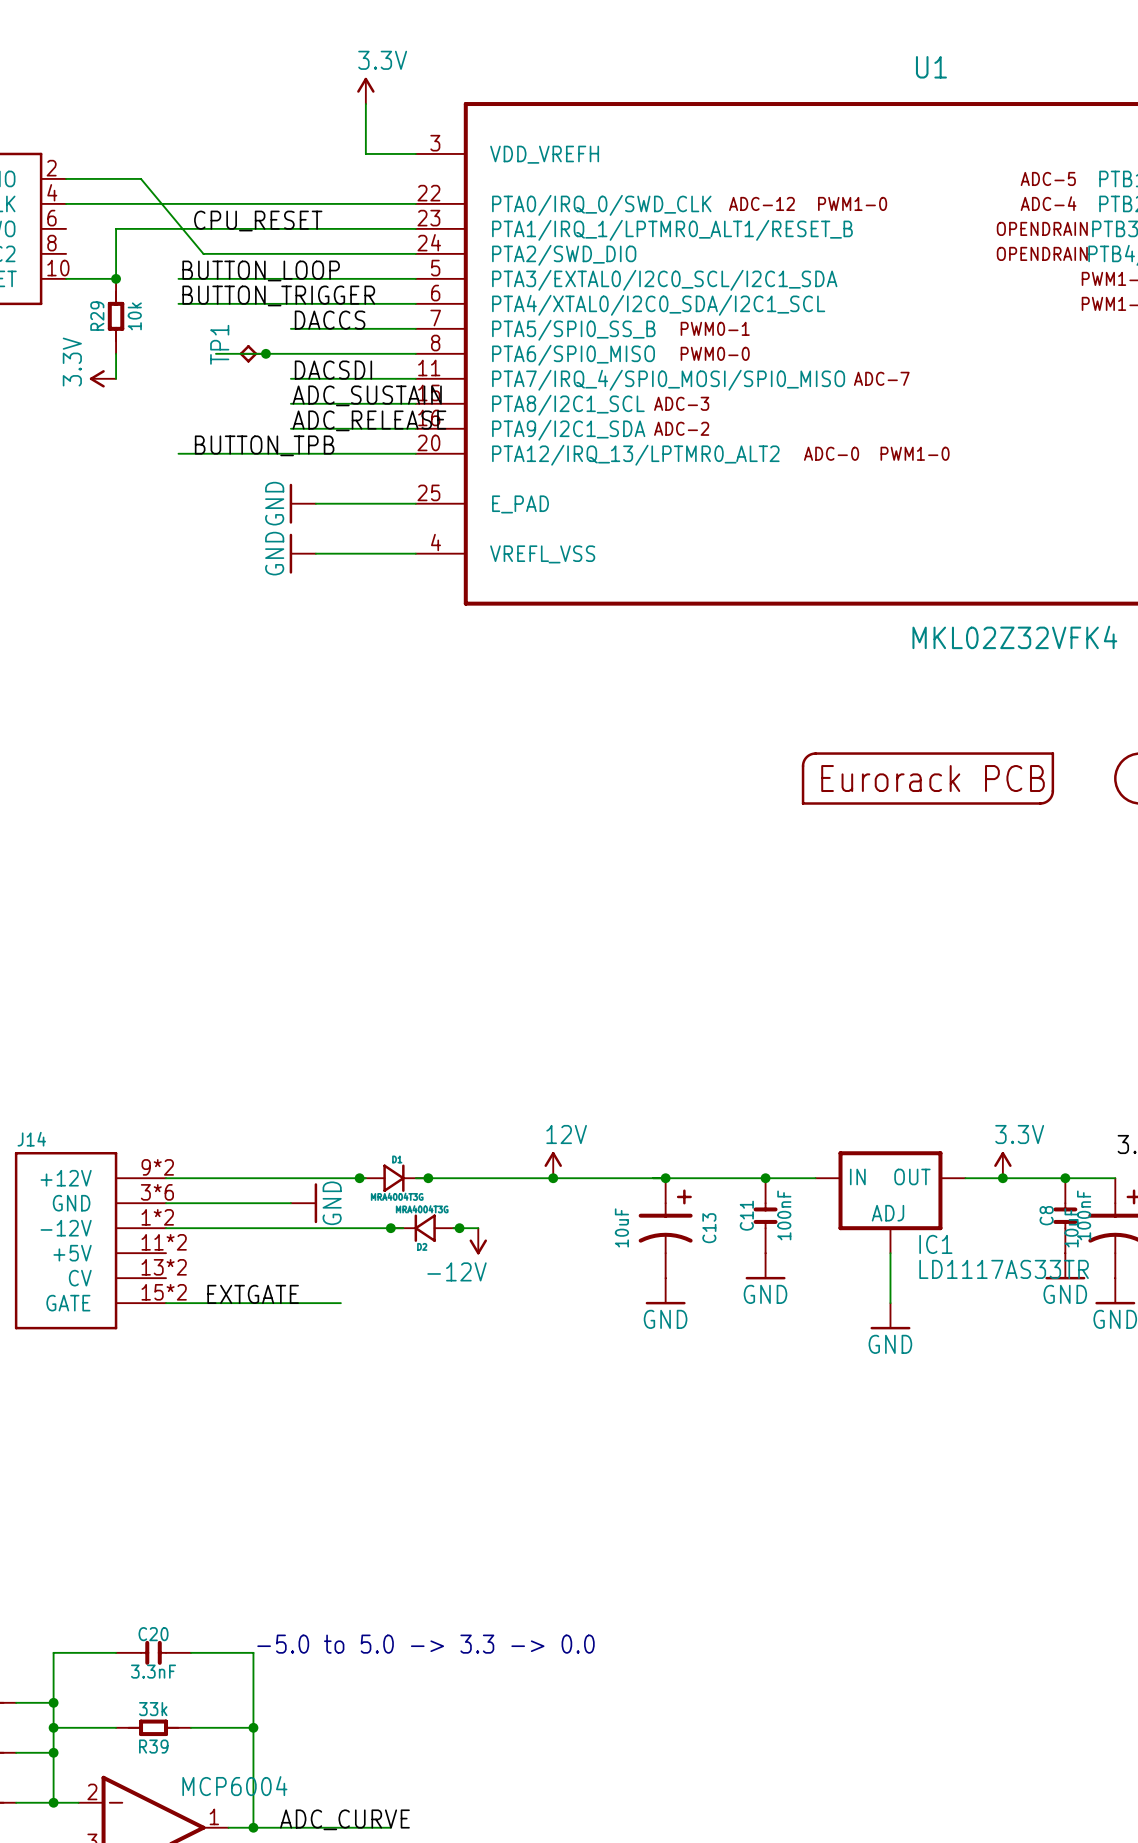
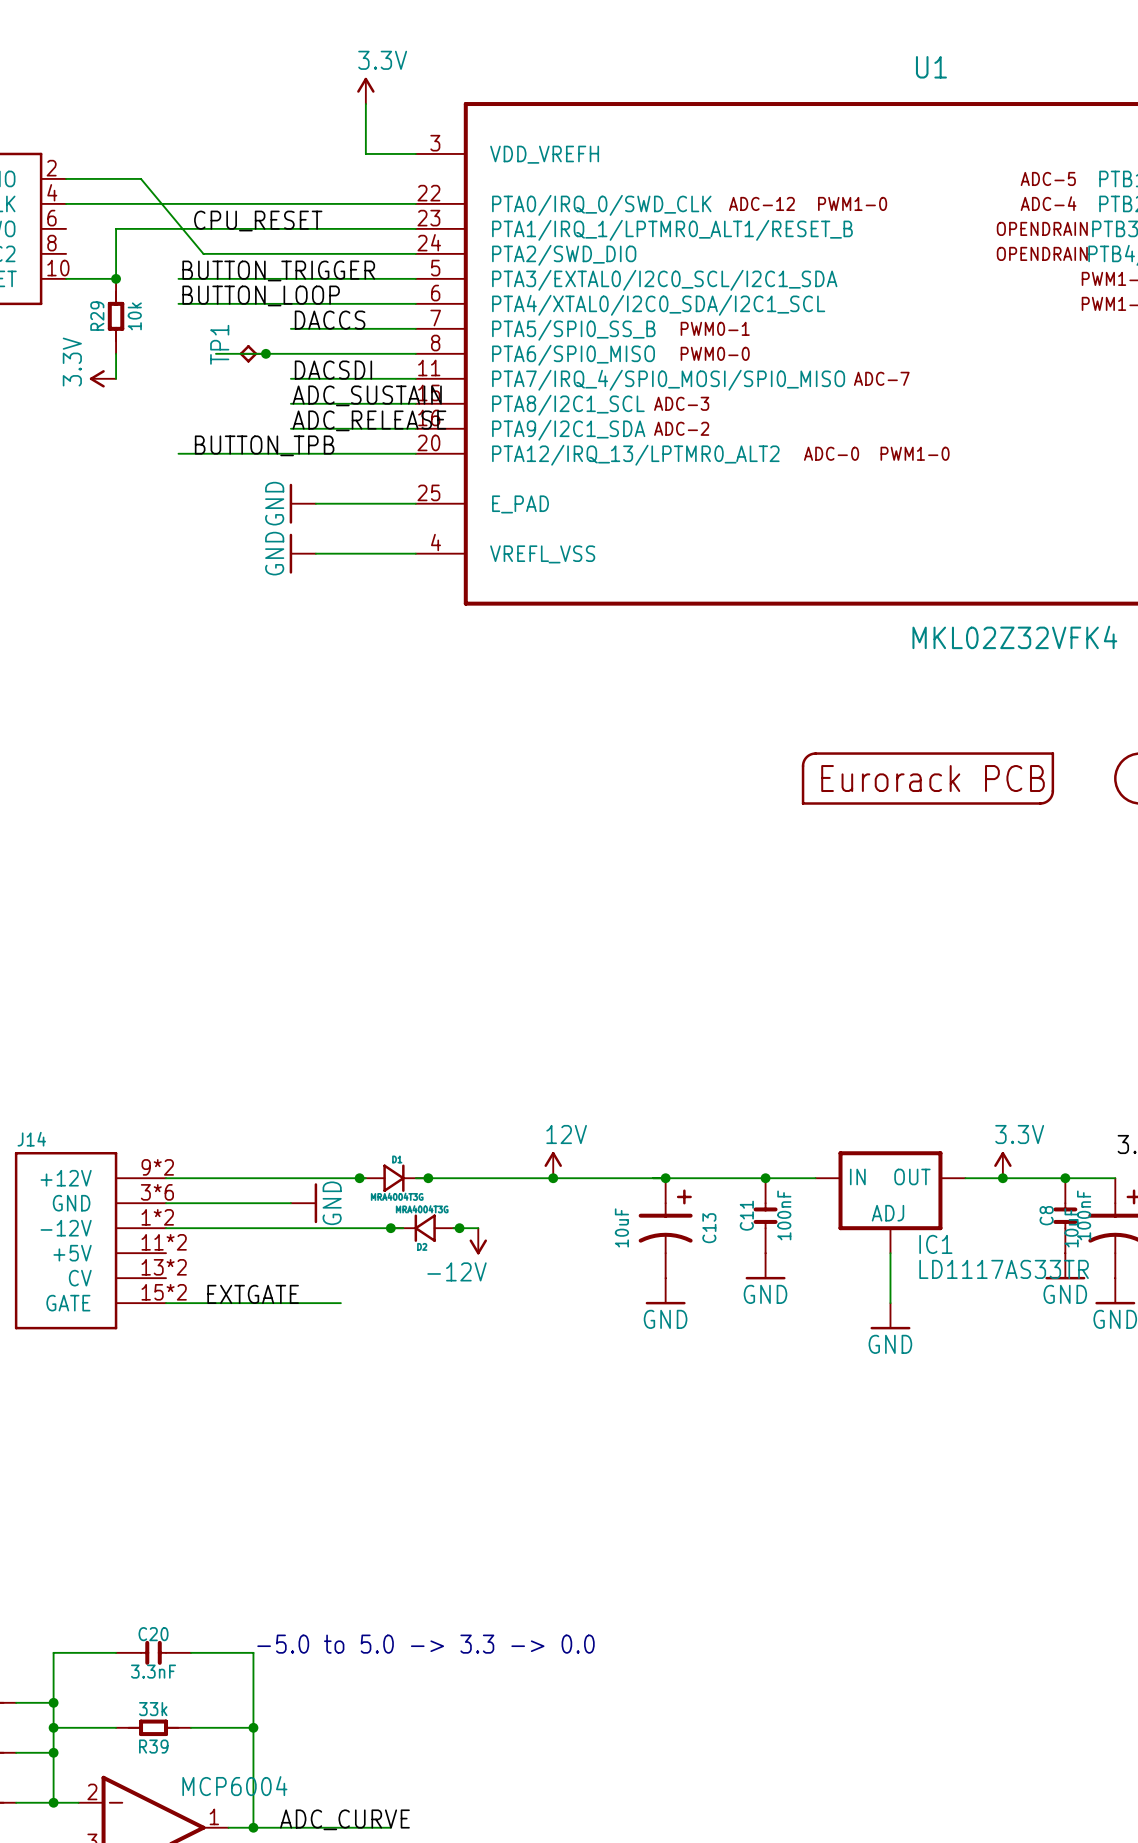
label: BUTTON_LOOP (261, 270) -> BUTTON_TRIGGER (278, 270)
label: BUTTON_TRIGGER (278, 295) -> BUTTON_LOOP (261, 295)

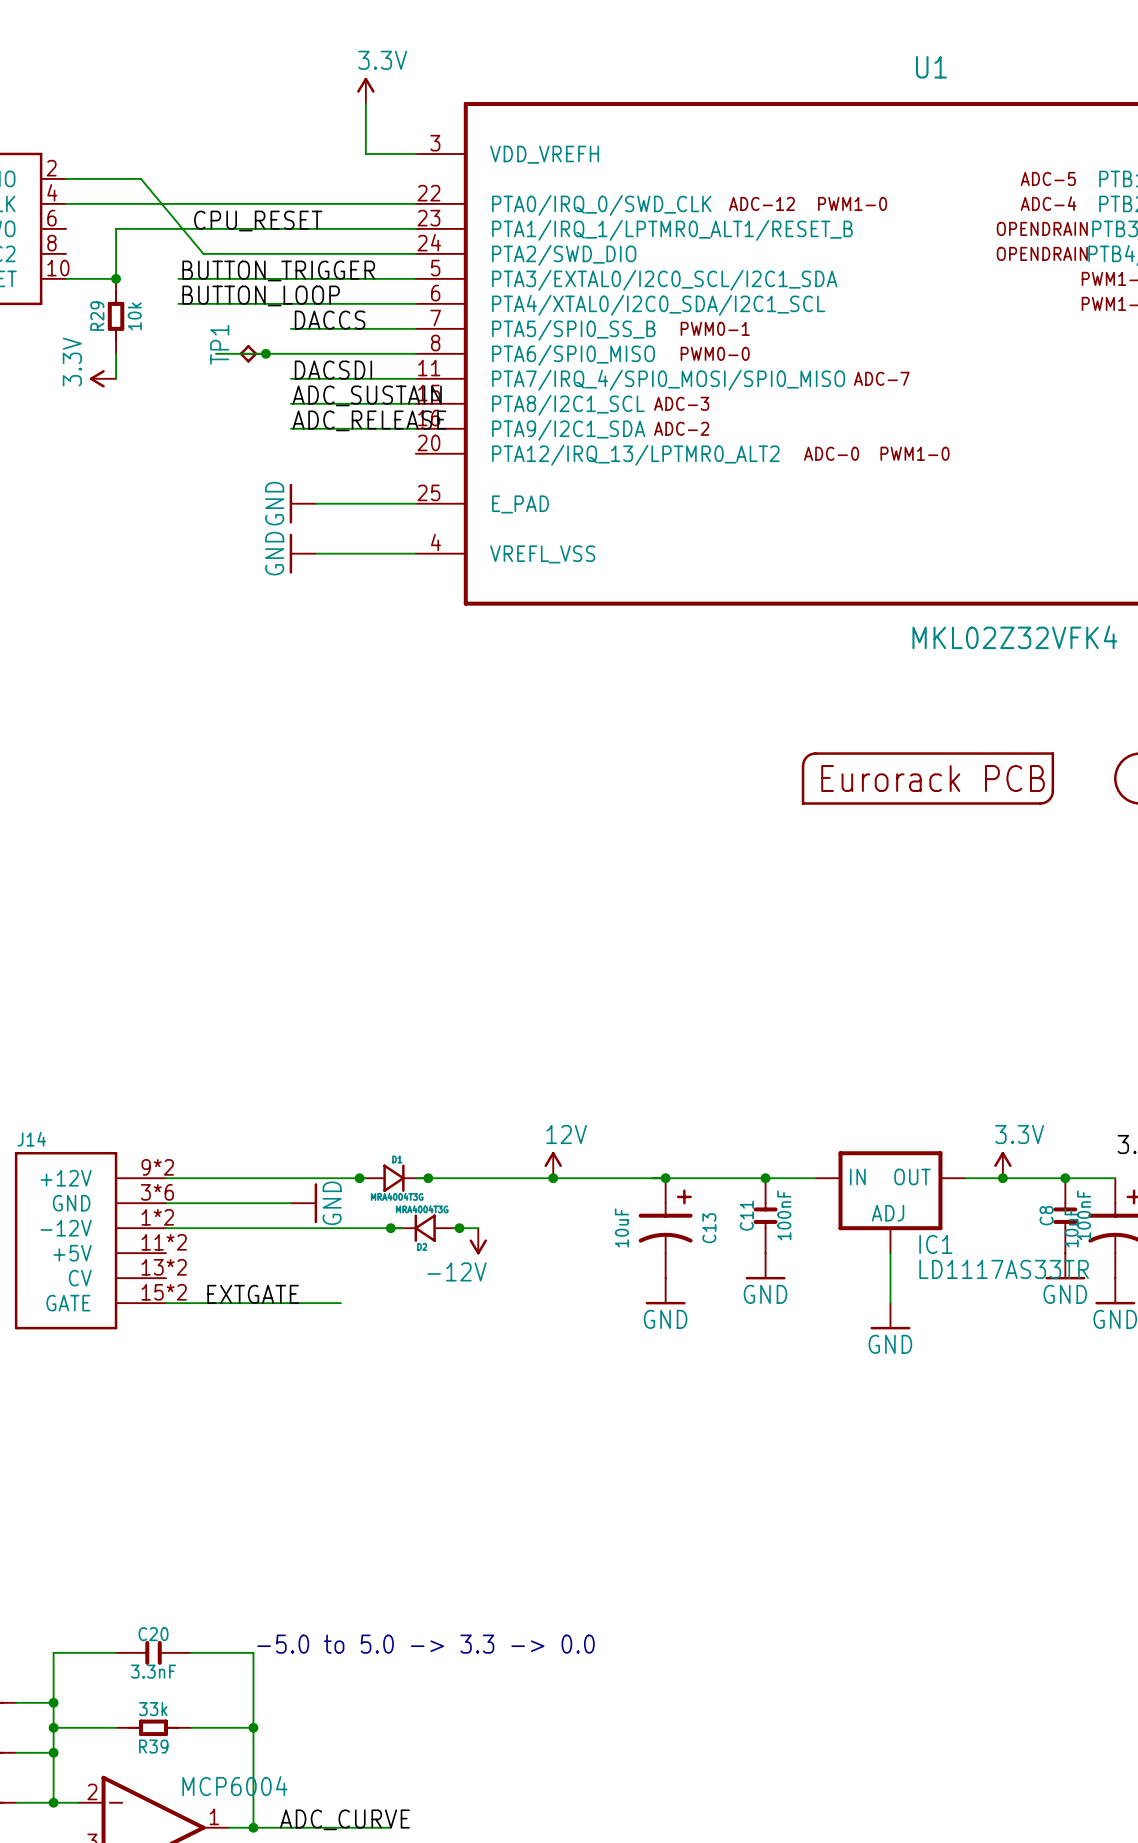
label: BUTTON_TPB (264, 445) -> none
wire: (178, 453) (415, 453) -> none

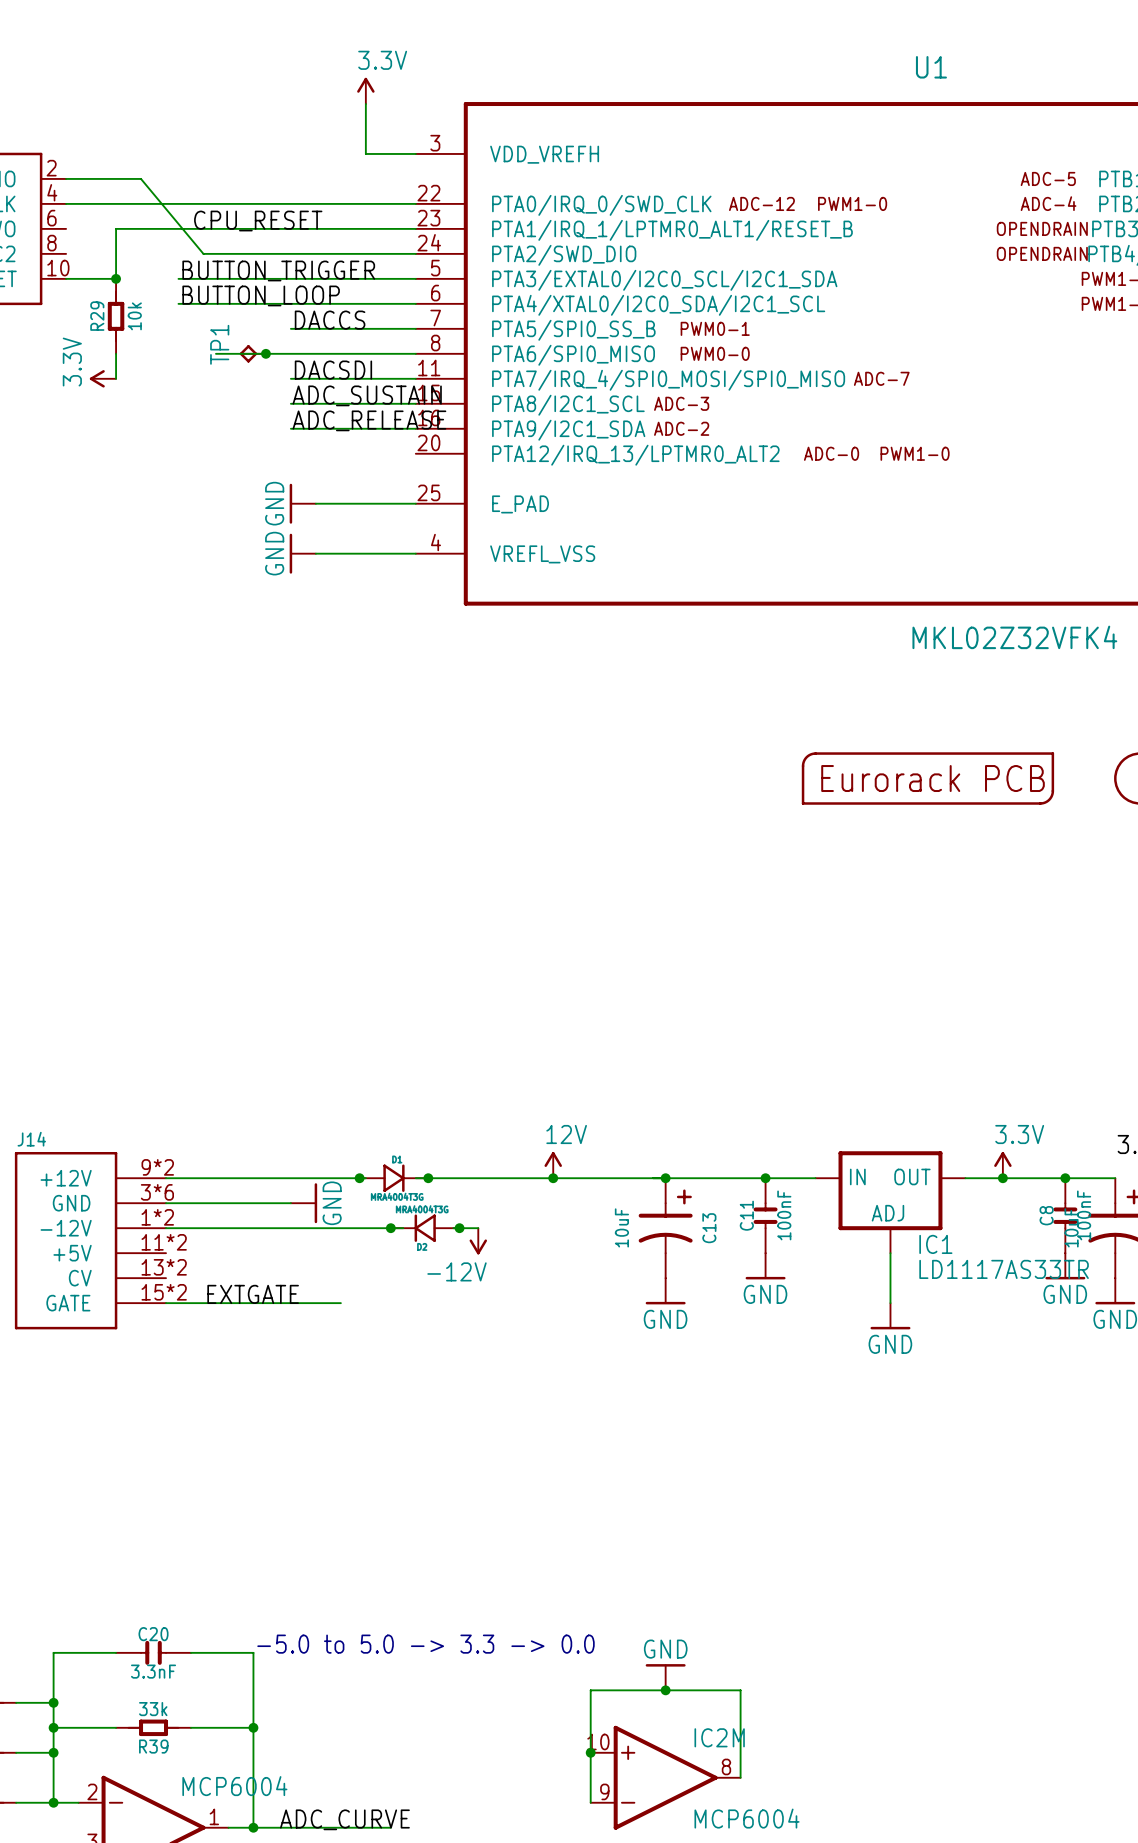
power symbol: none -> GND (665, 1677)
junction: none -> (665, 1690)
junction: none -> (590, 1752)
IC2M: none -> MCP6004 (665, 1777)
wire: none -> (740, 1777) (740, 1690) (590, 1690) (590, 1802)

